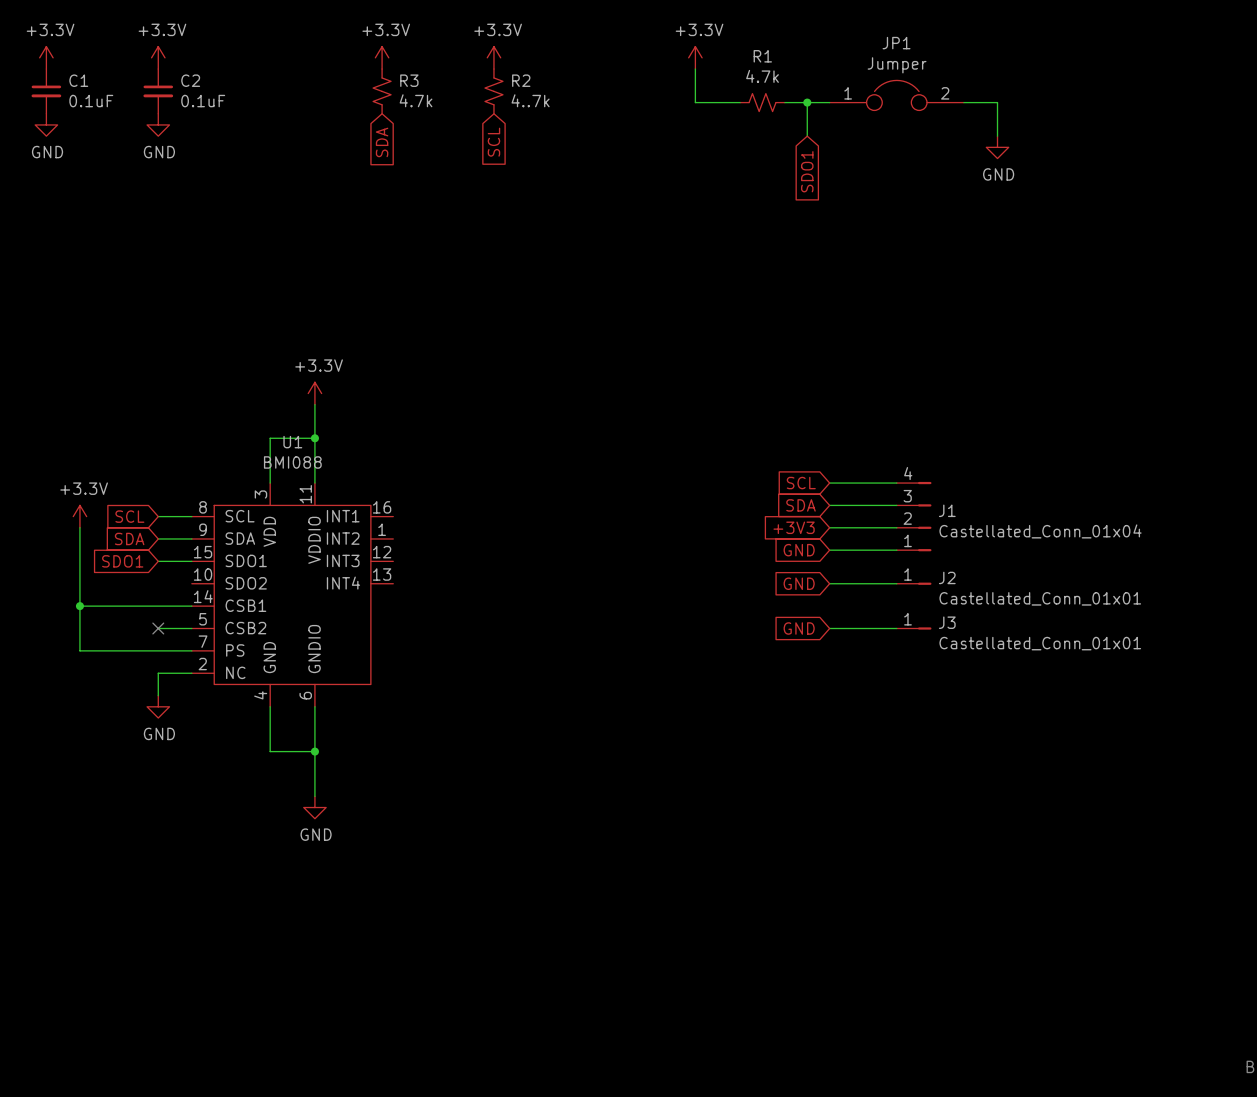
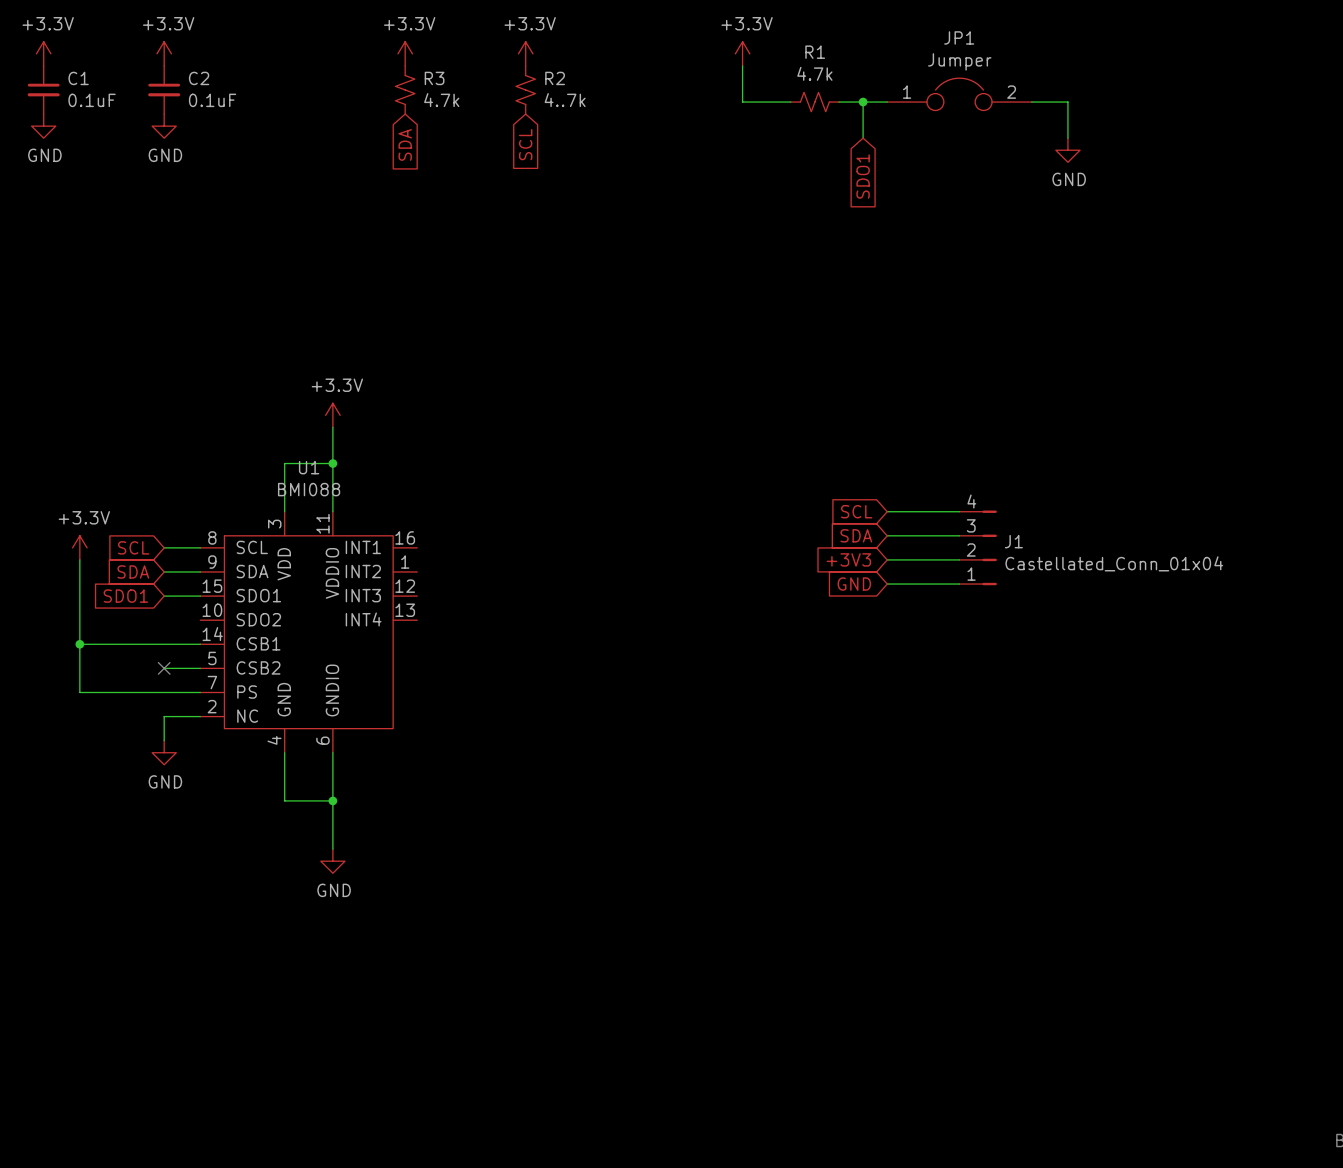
global label: GND (799, 583) -> none
wire: (829, 583) (896, 583) -> none
J2: Castellated_Conn_01x01 (914, 583) -> none
global label: GND (799, 628) -> none
wire: (829, 628) (896, 628) -> none
J3: Castellated_Conn_01x01 (914, 628) -> none

